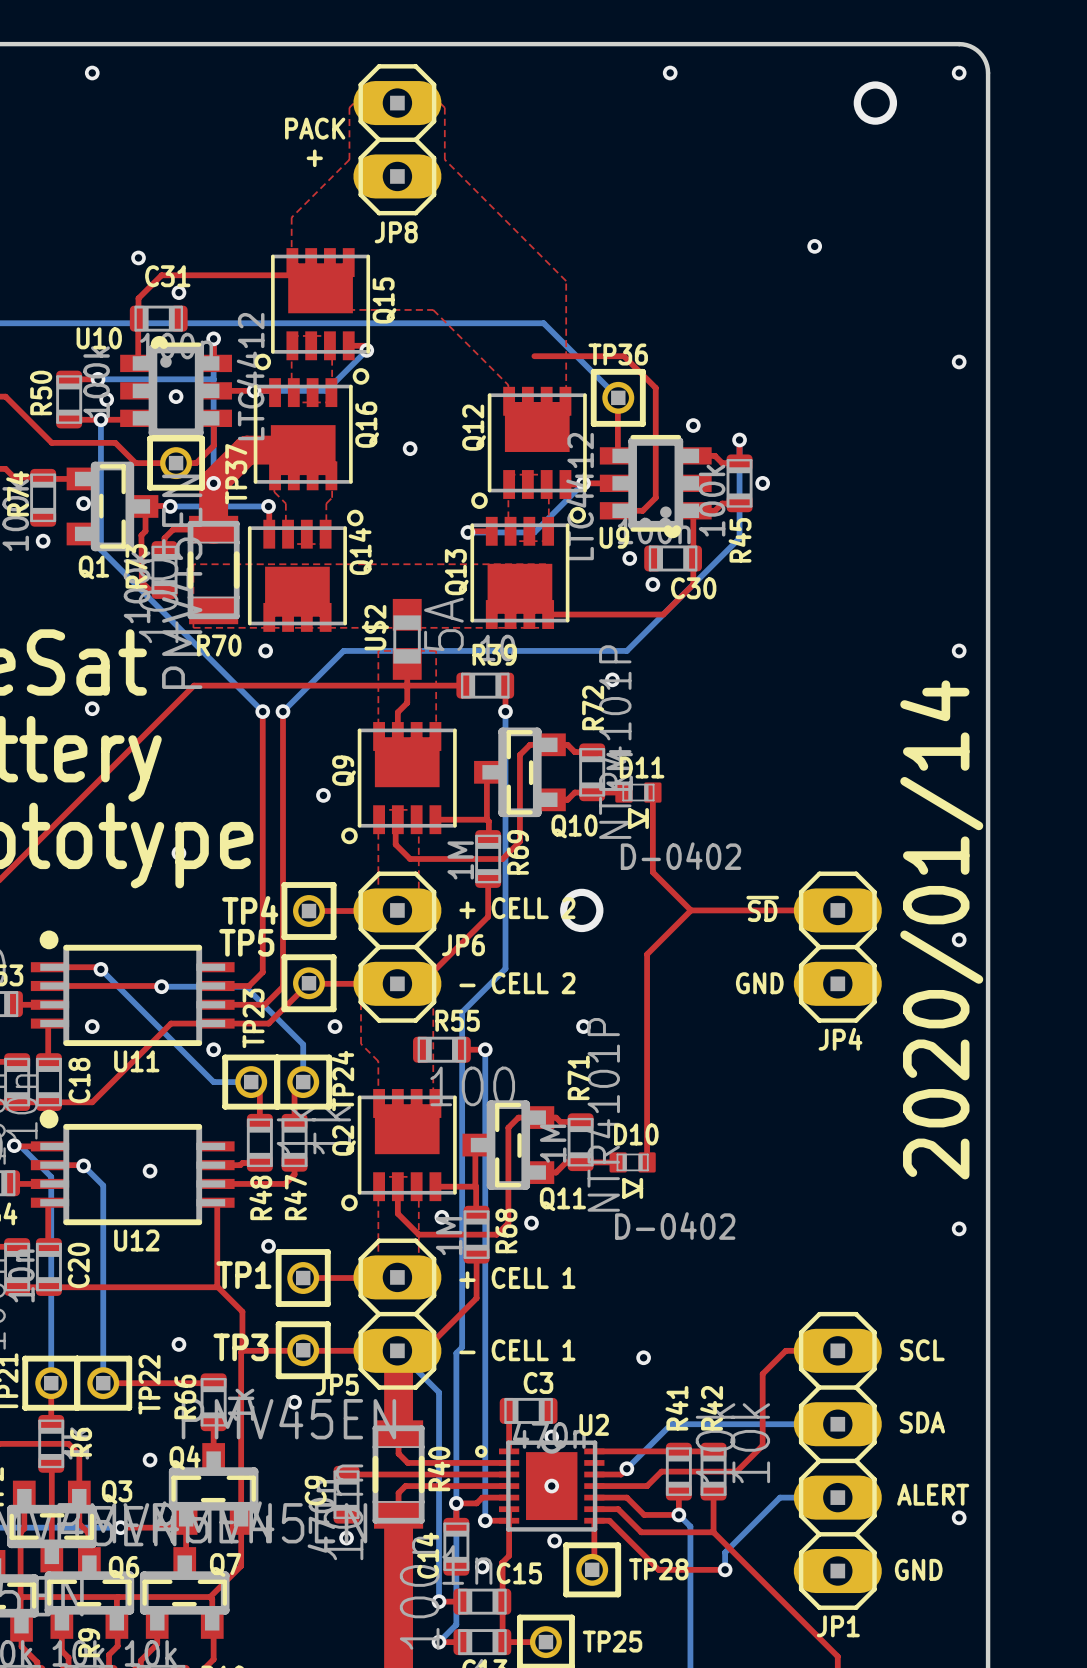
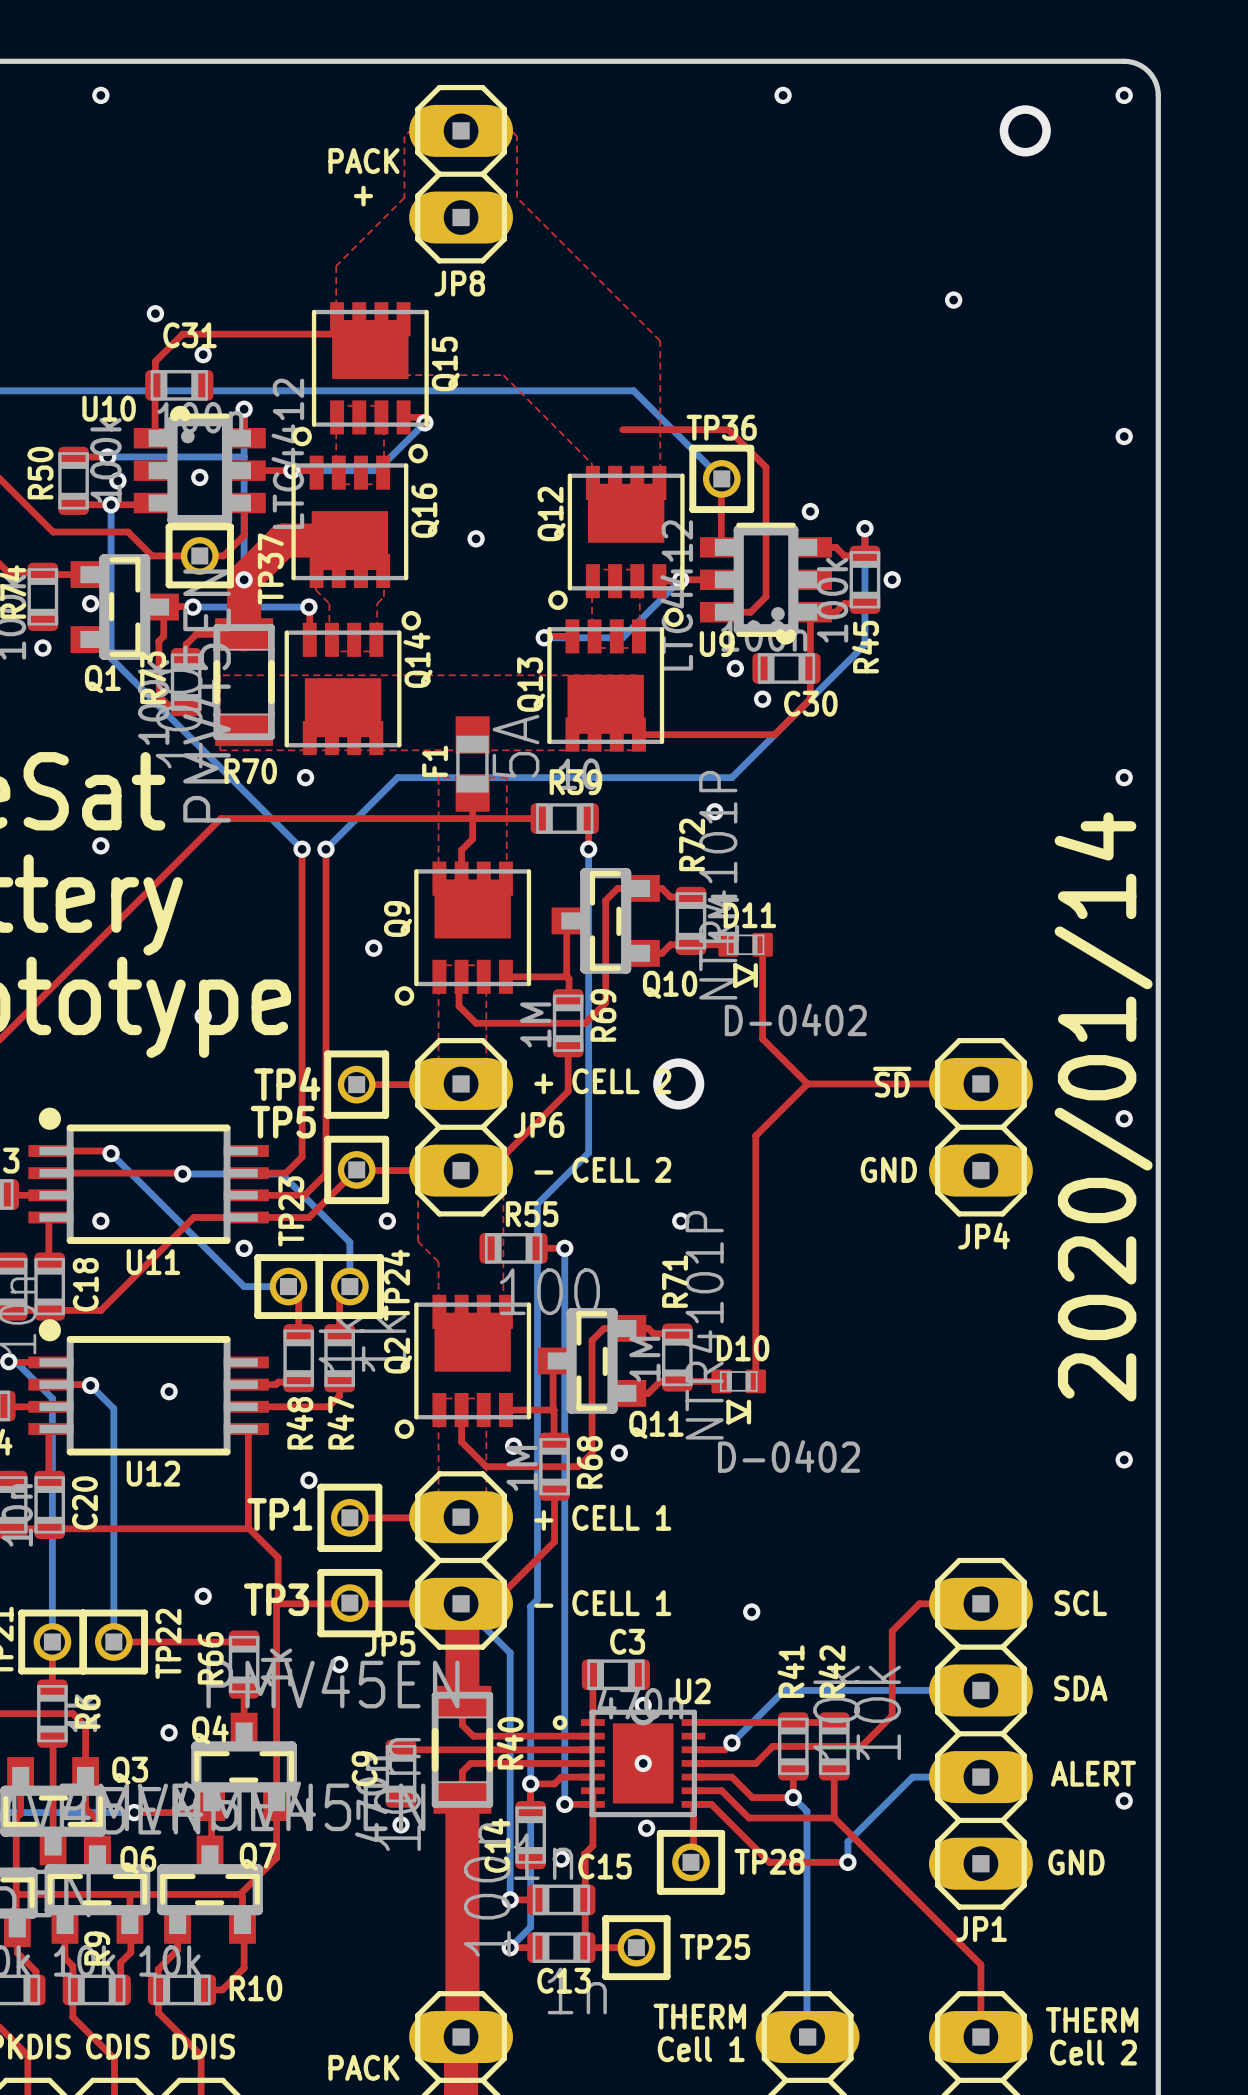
U$2 name: U$2 (375, 627) -> F1 (435, 761)

